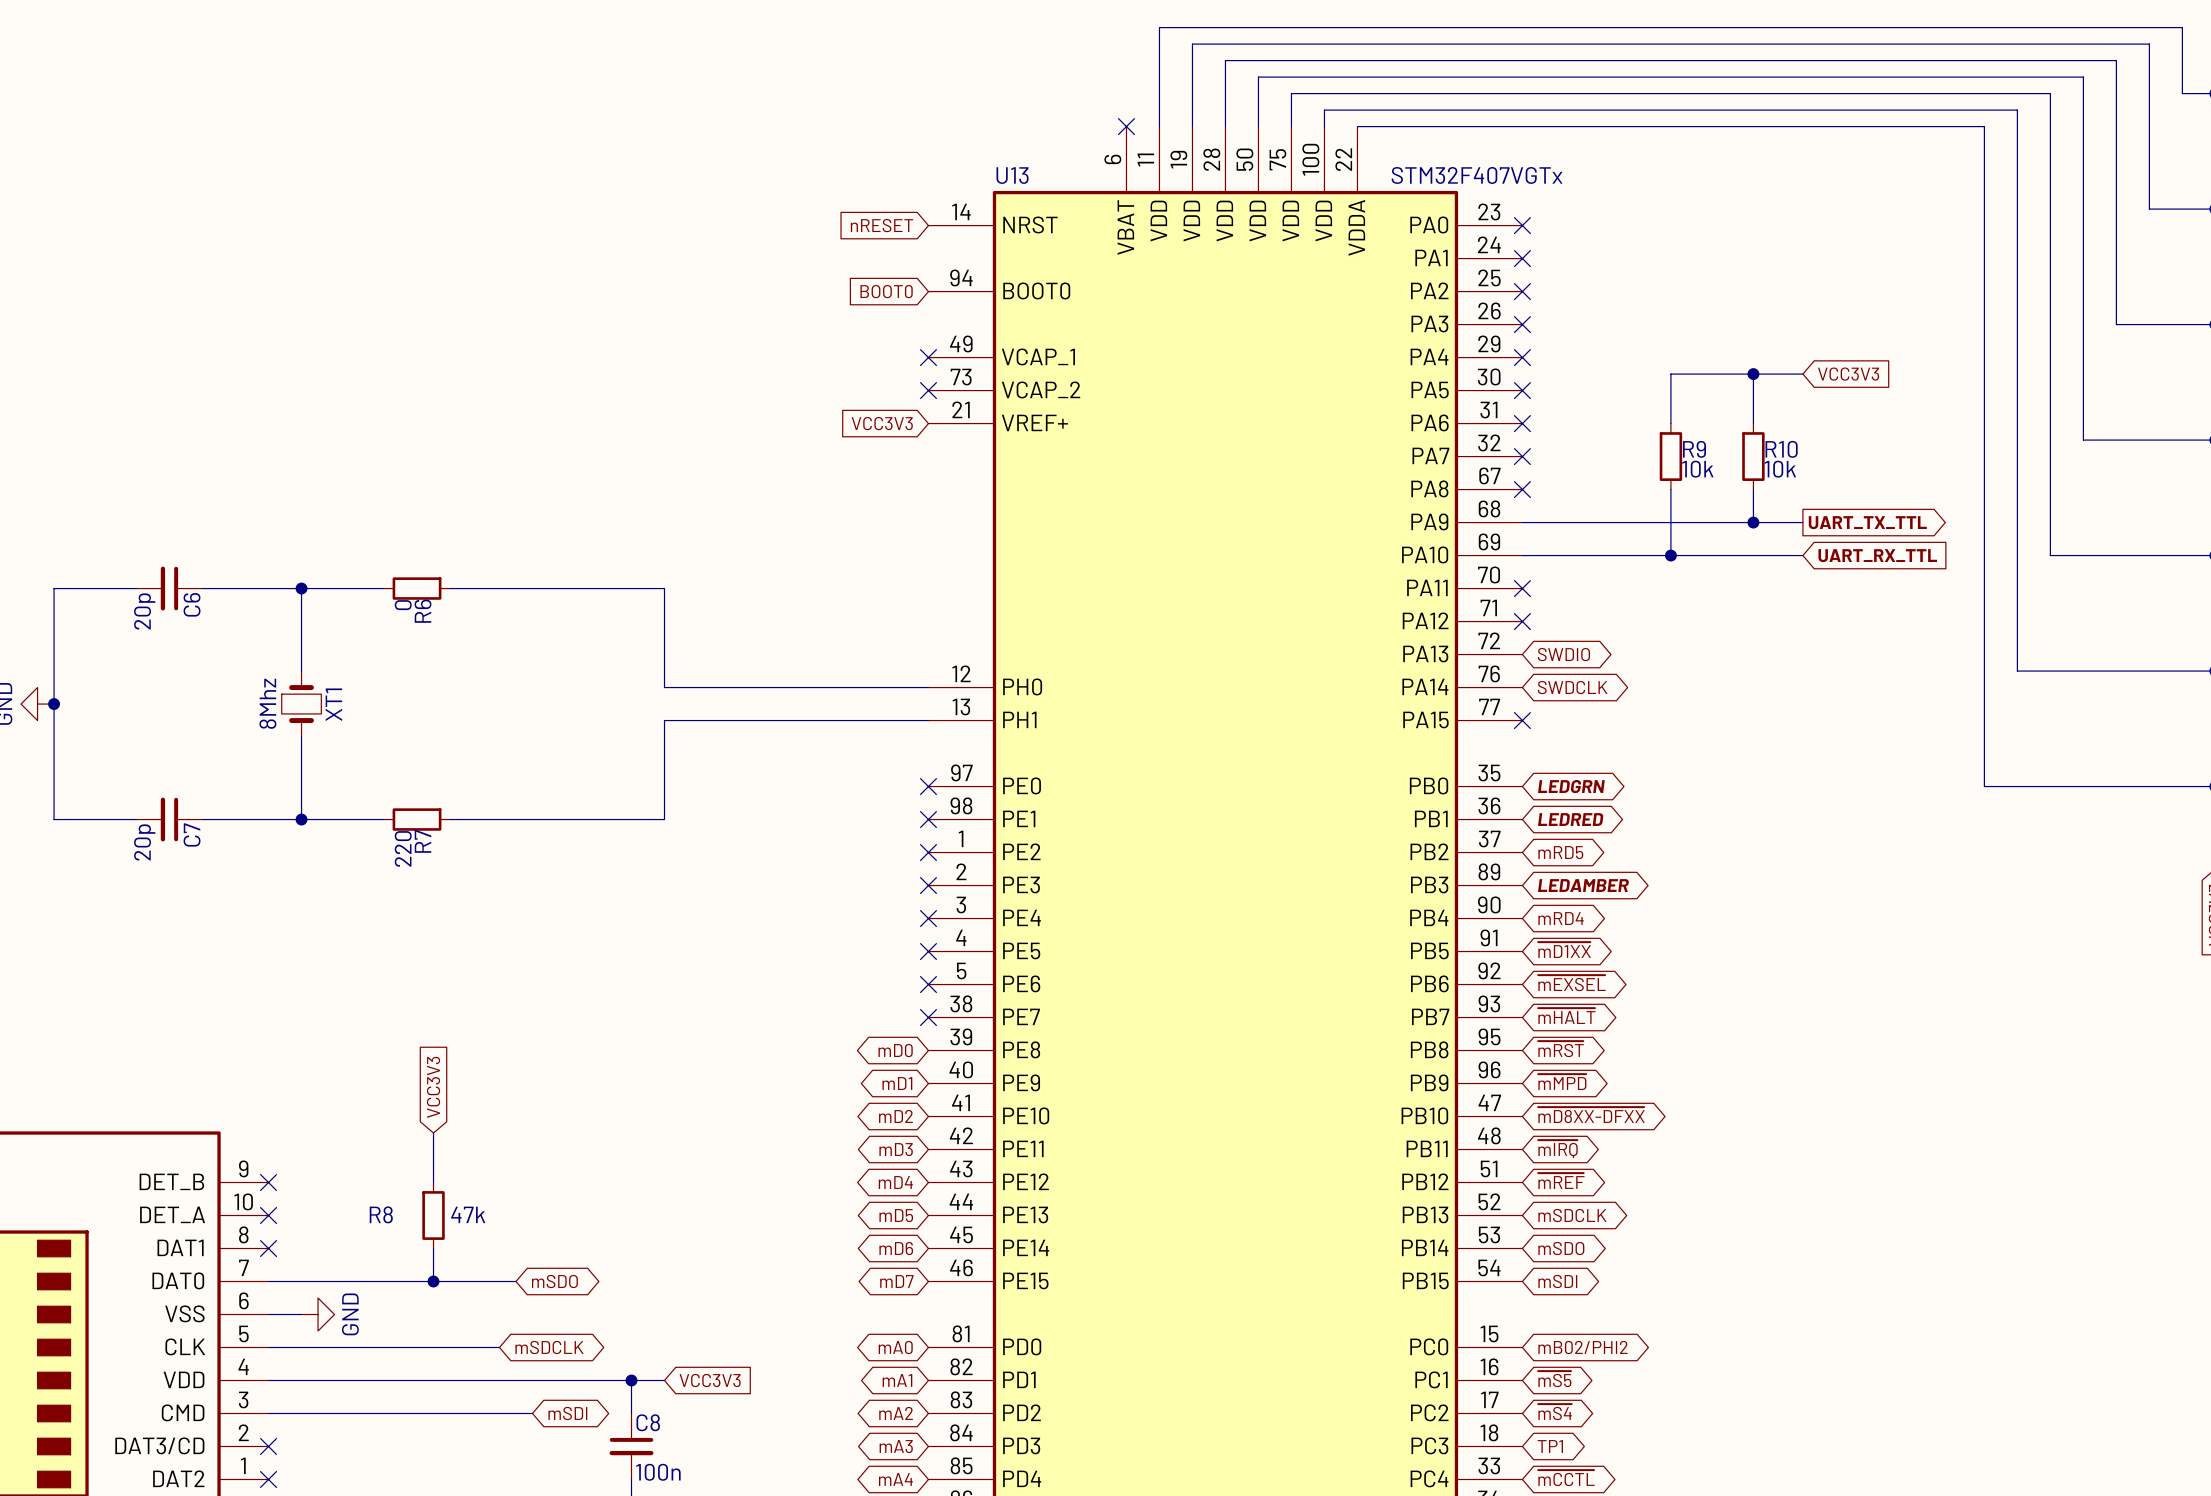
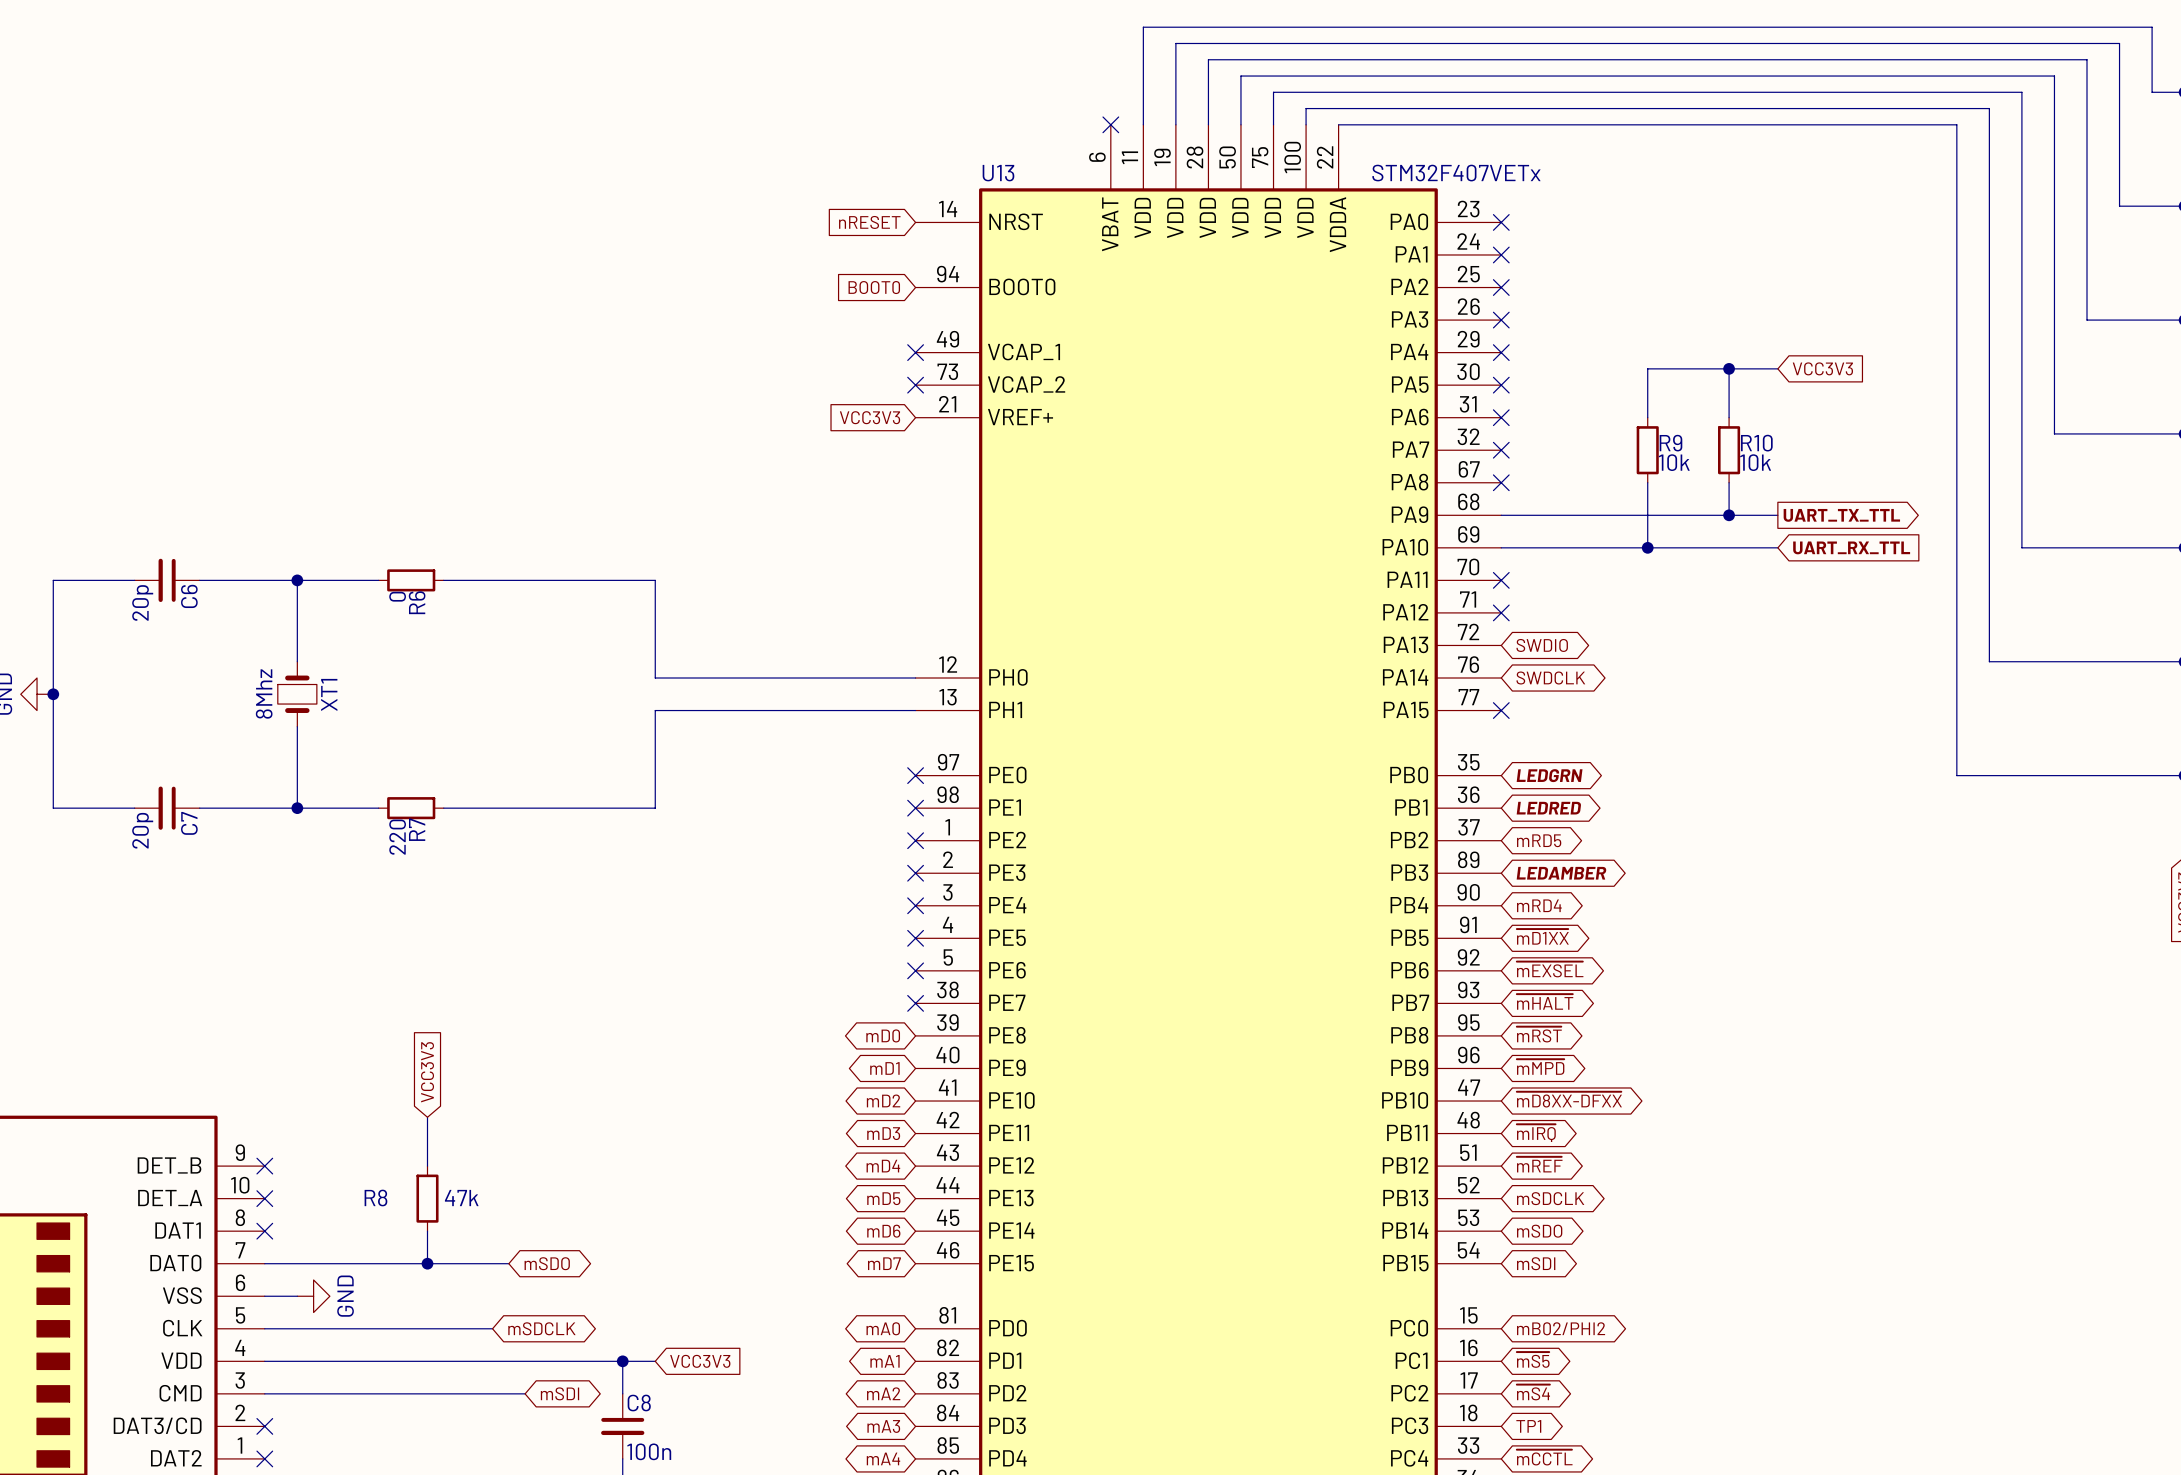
U13 value: STM32F407VGTx (1477, 175) -> STM32F407VETx (1456, 173)

